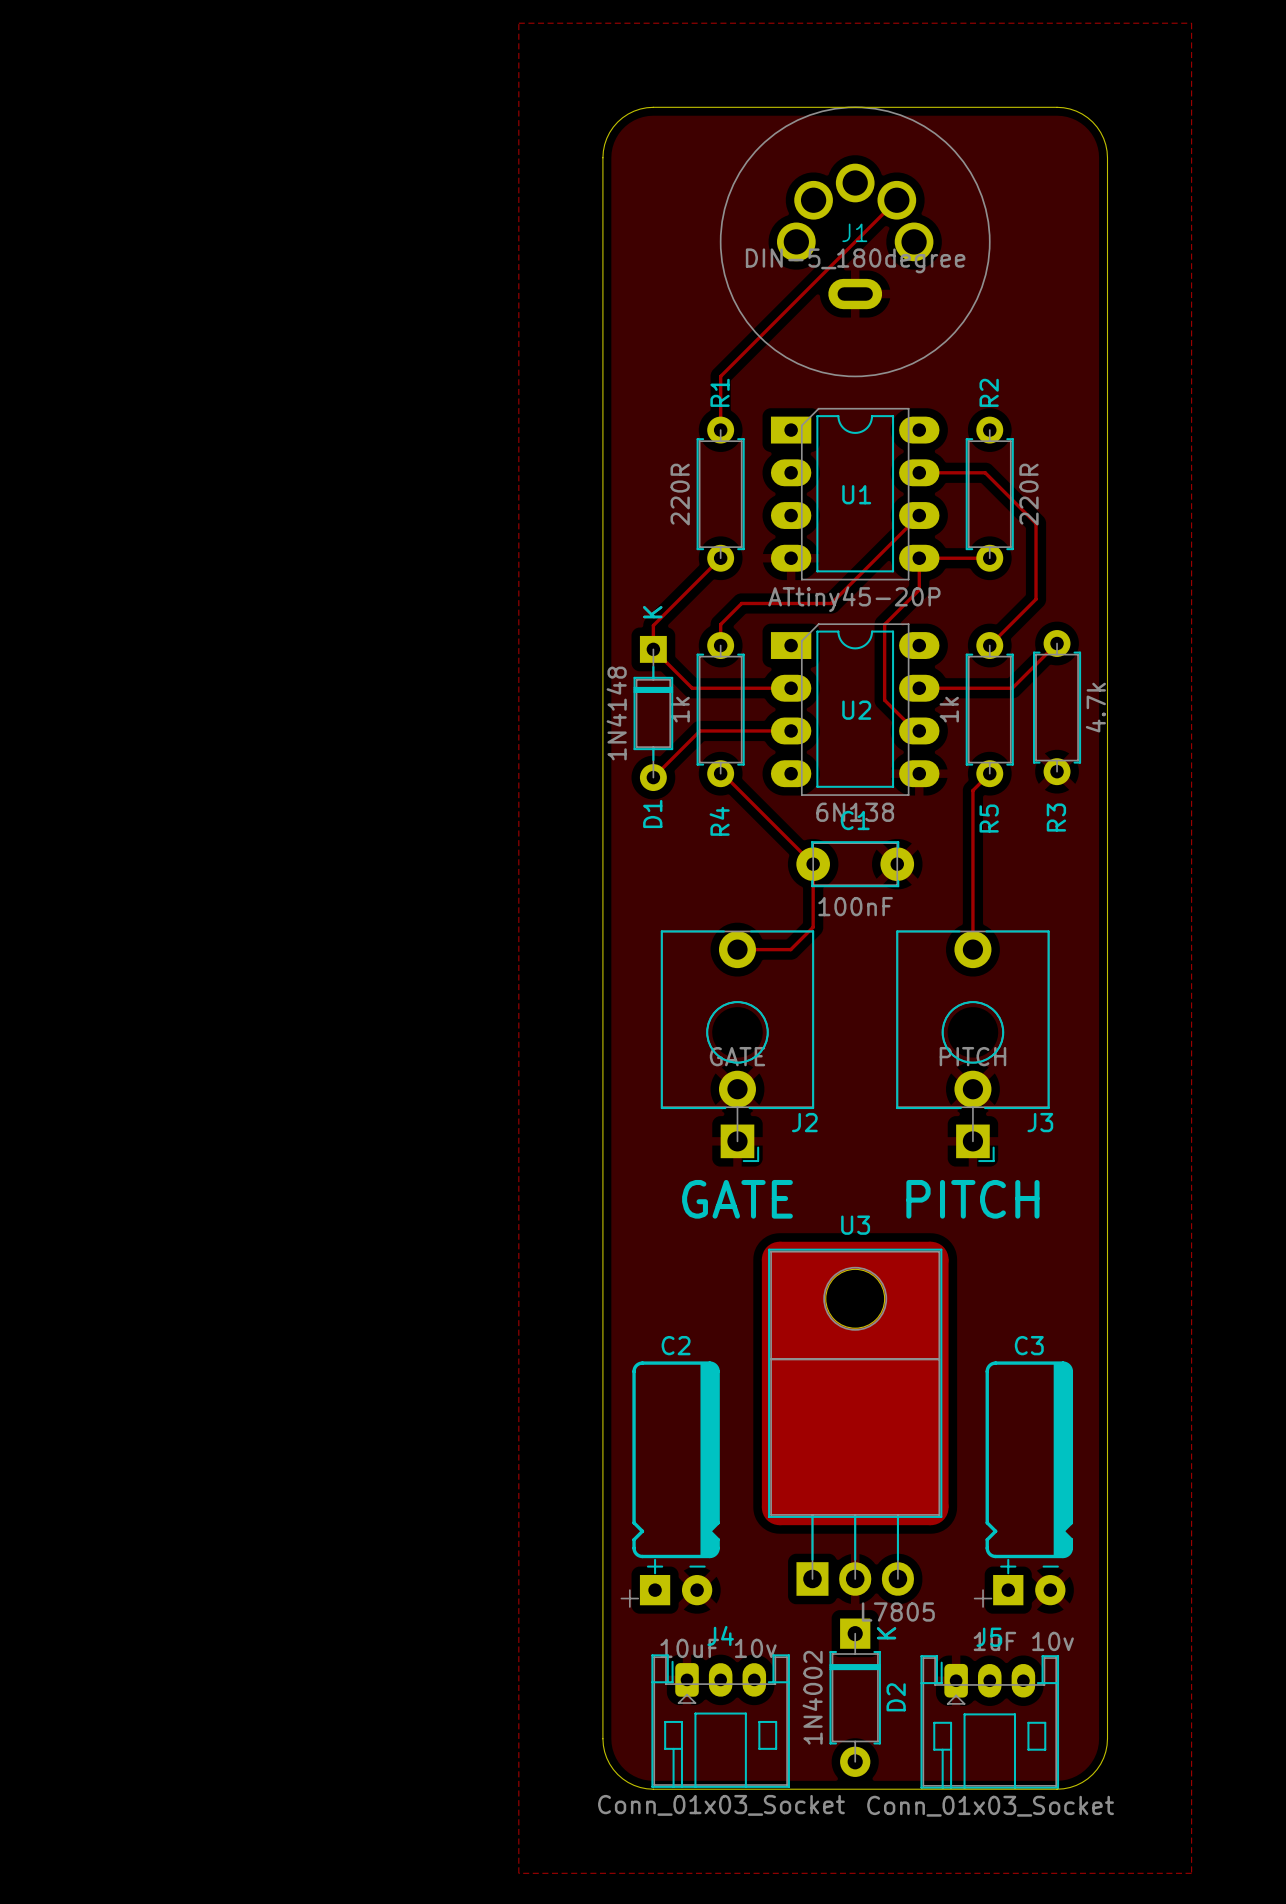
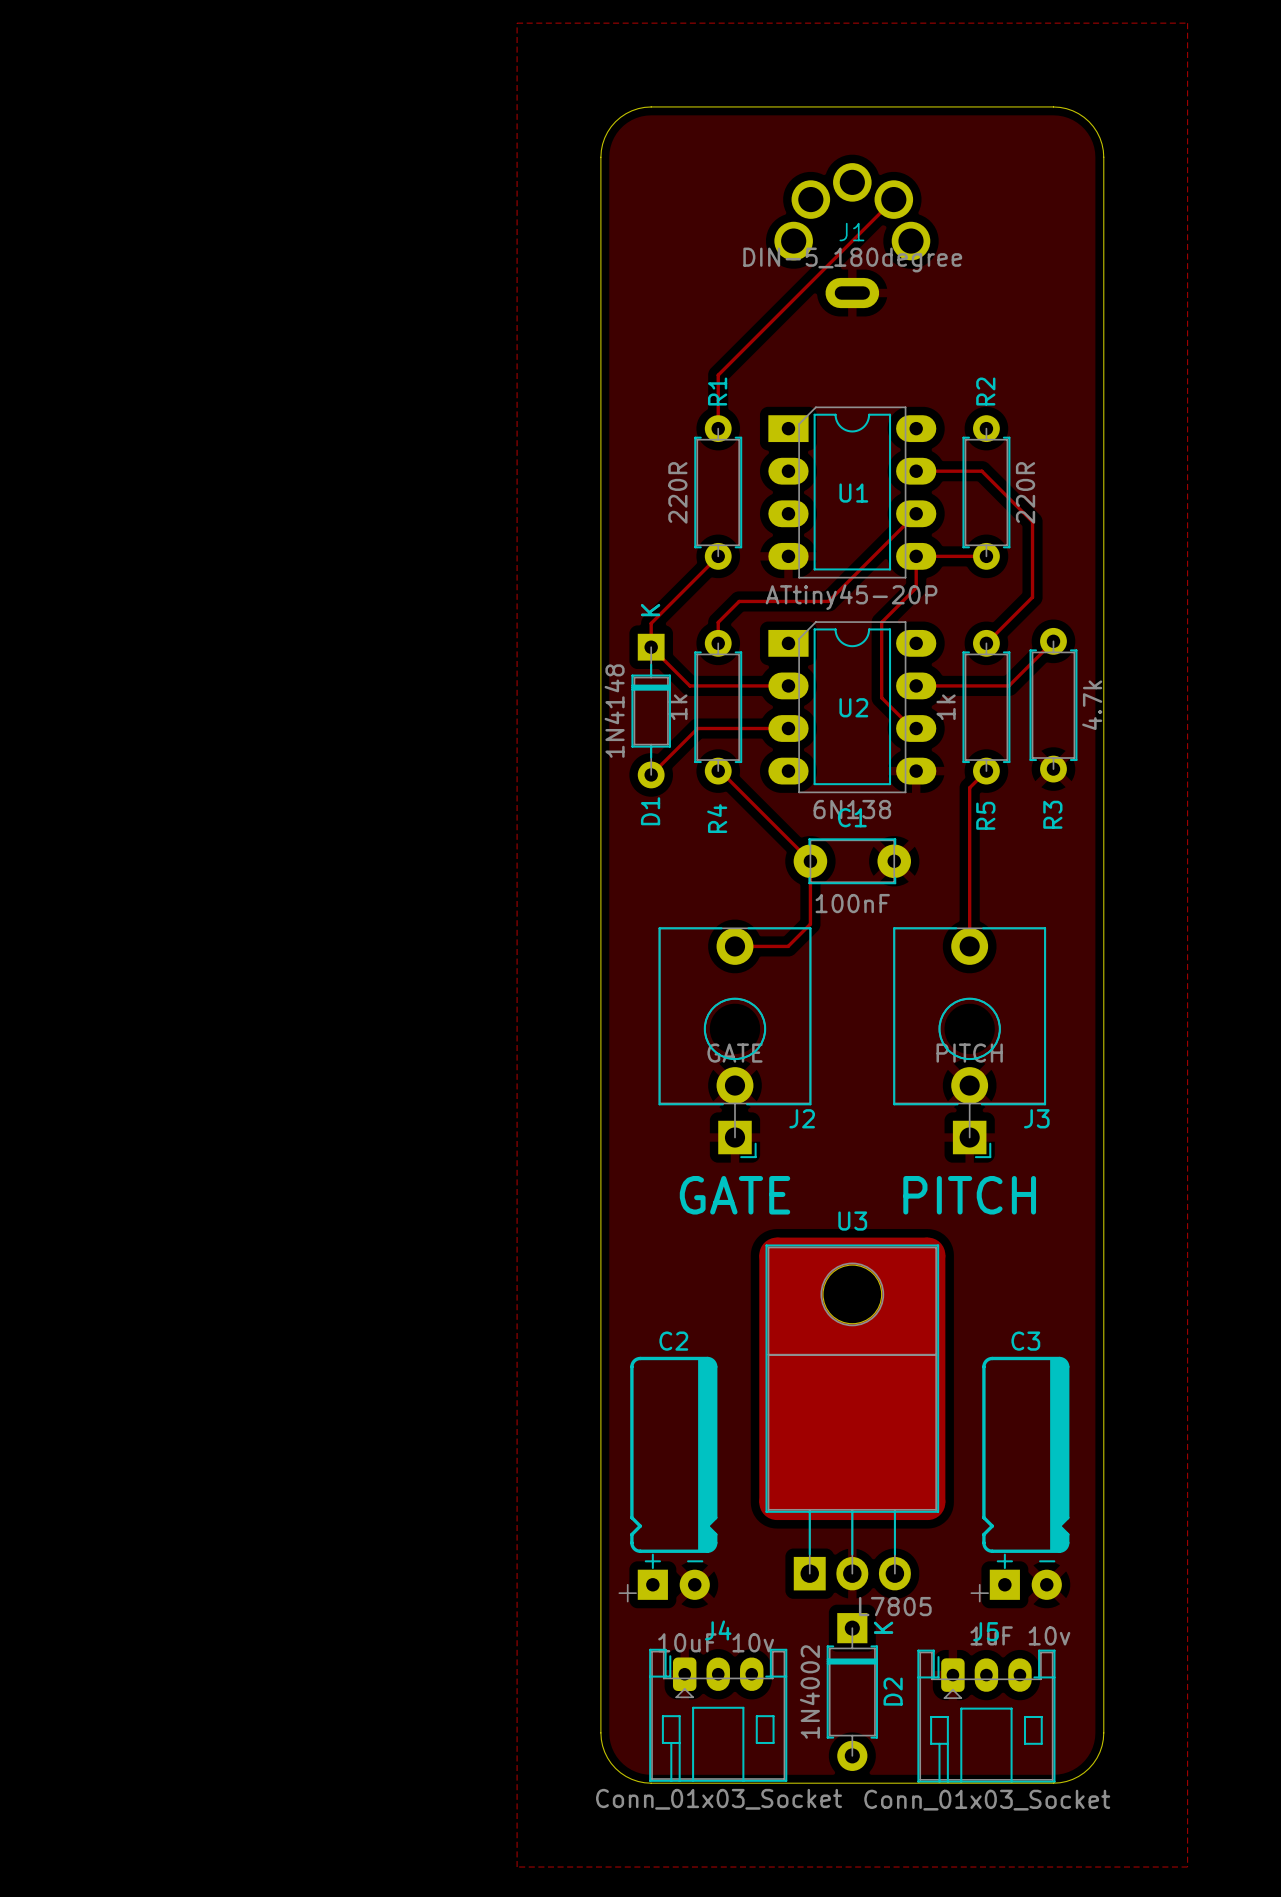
J1 footprint: [719, 106, 991, 378] -> [774, 163, 931, 309]

